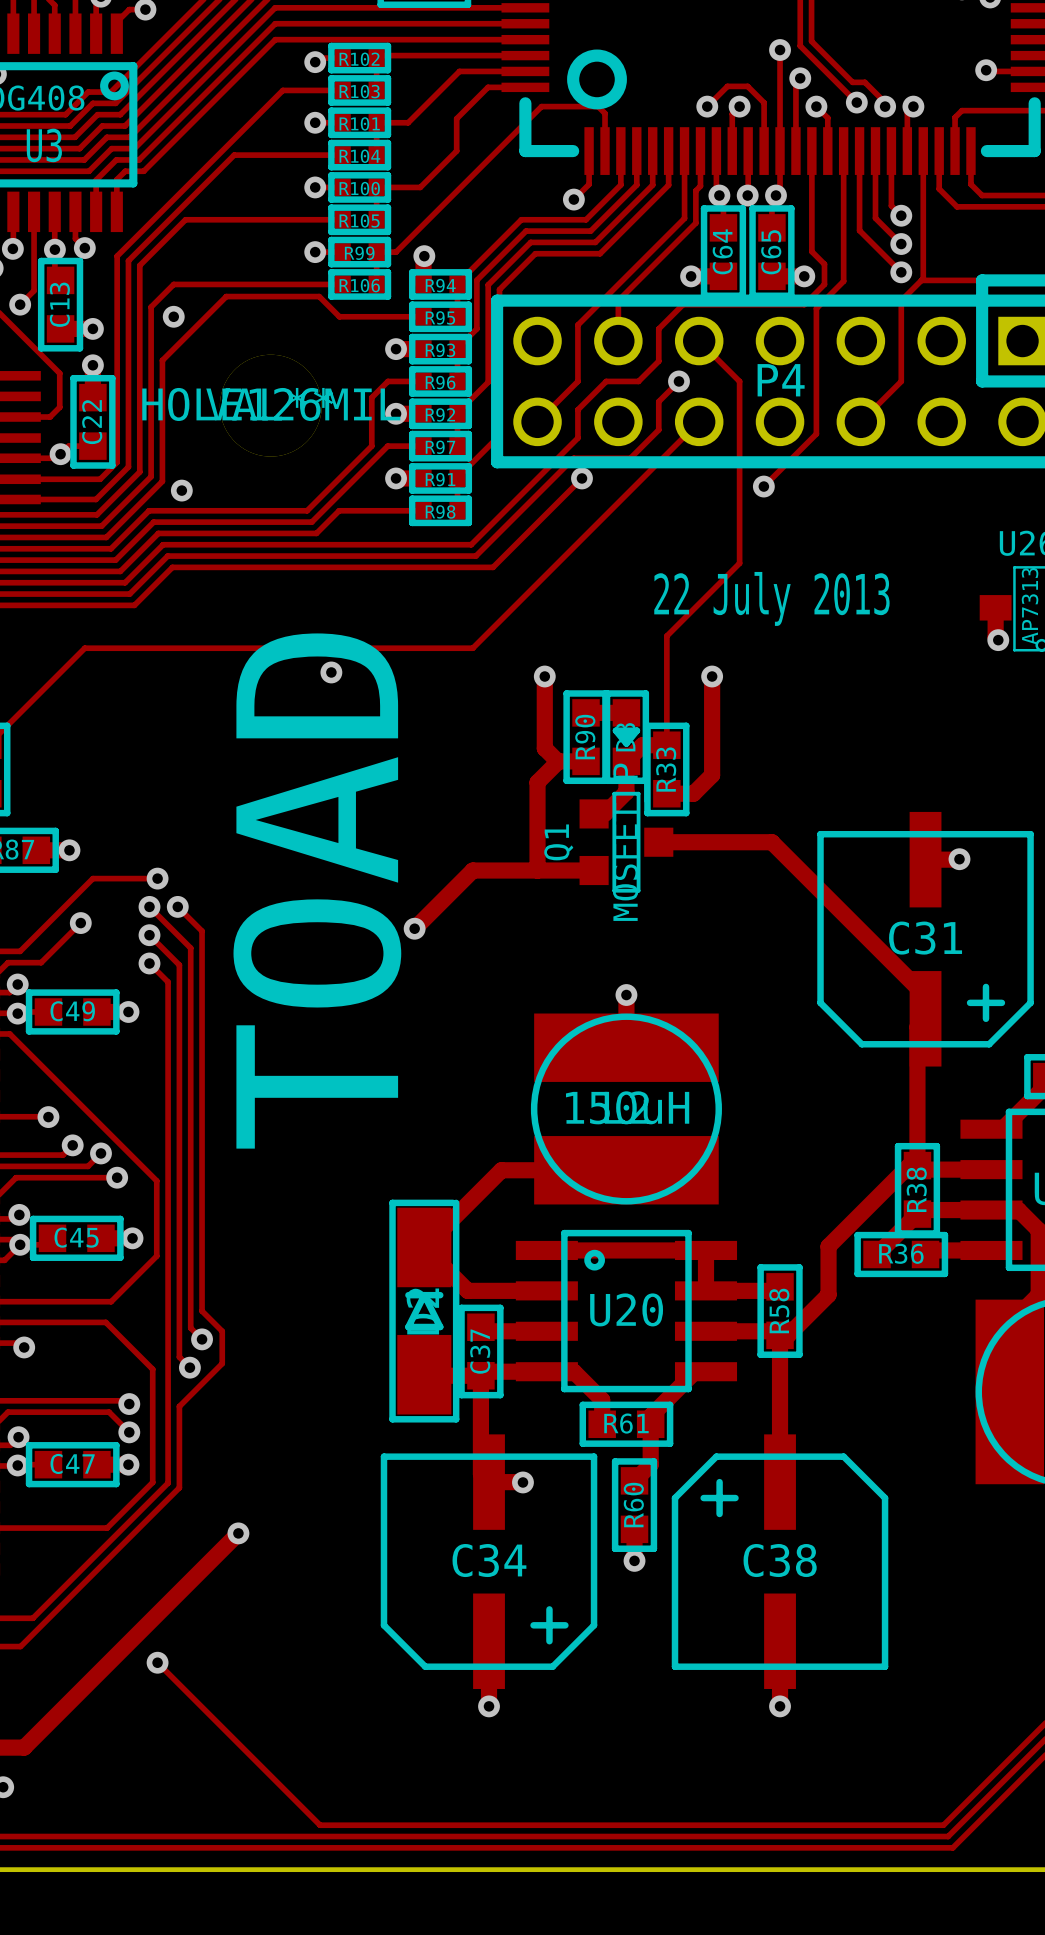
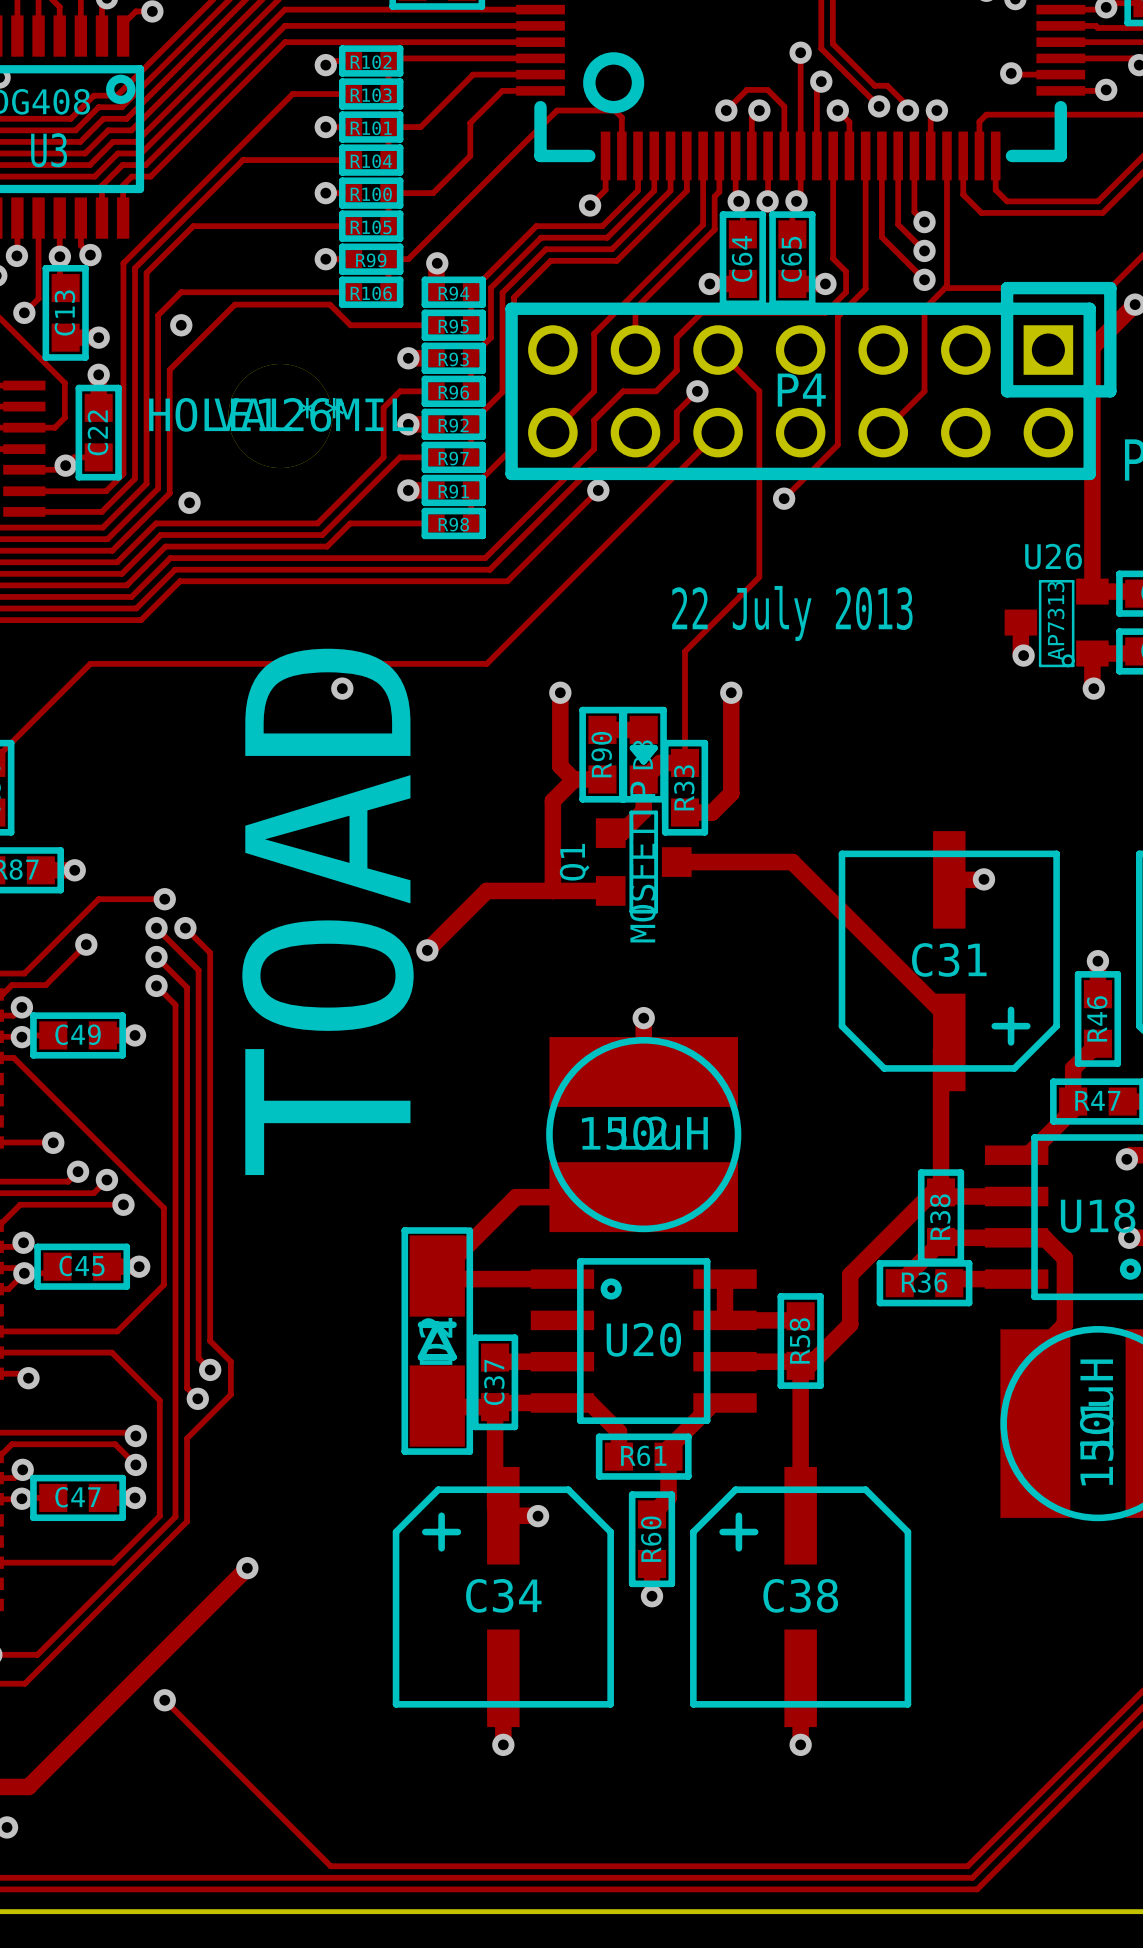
track: (427, 1250) (467, 1290) (546, 1290) -> (440, 1279) (562, 1279)
track: (546, 1250) (706, 1250) -> none
C34 rotation: 0° (489, 1561) -> 180° (503, 1597)

